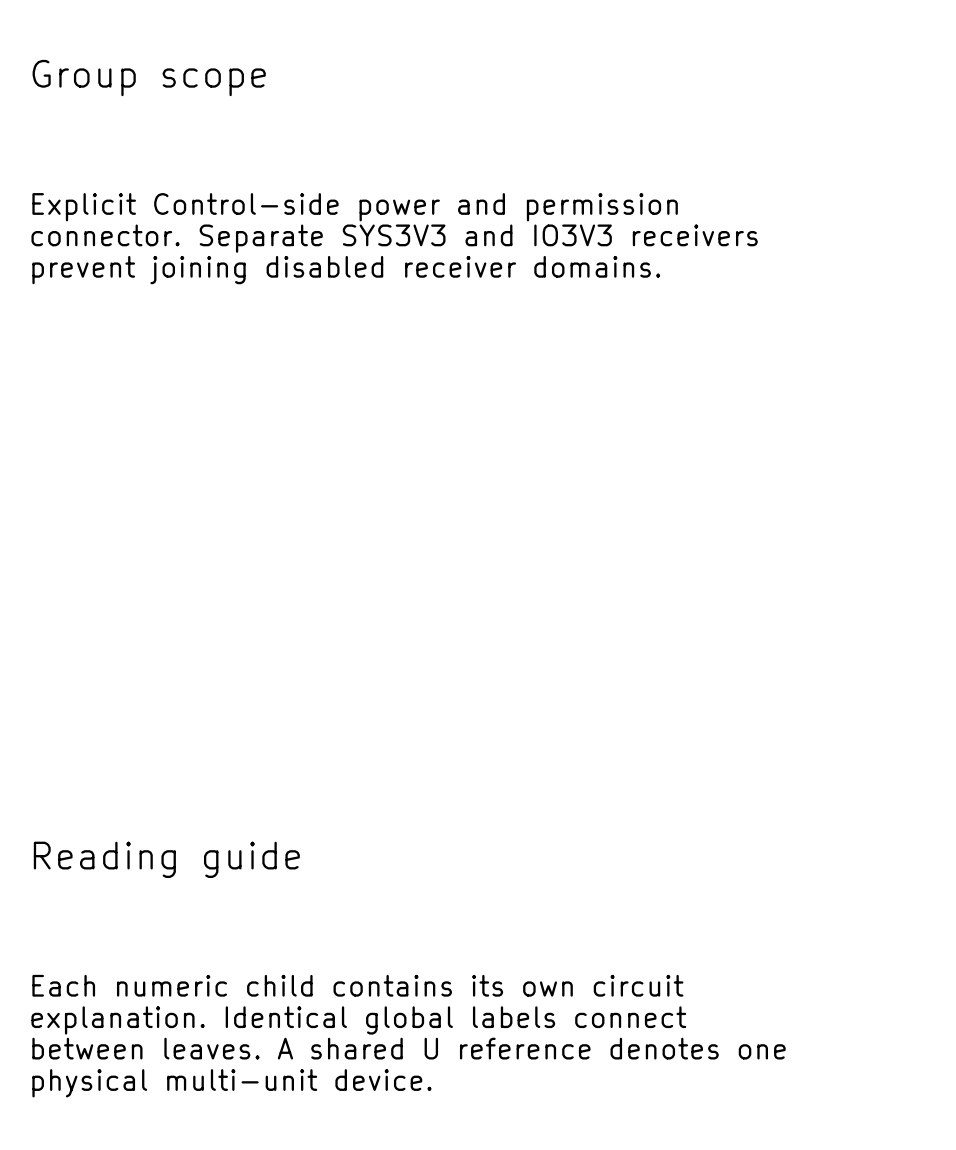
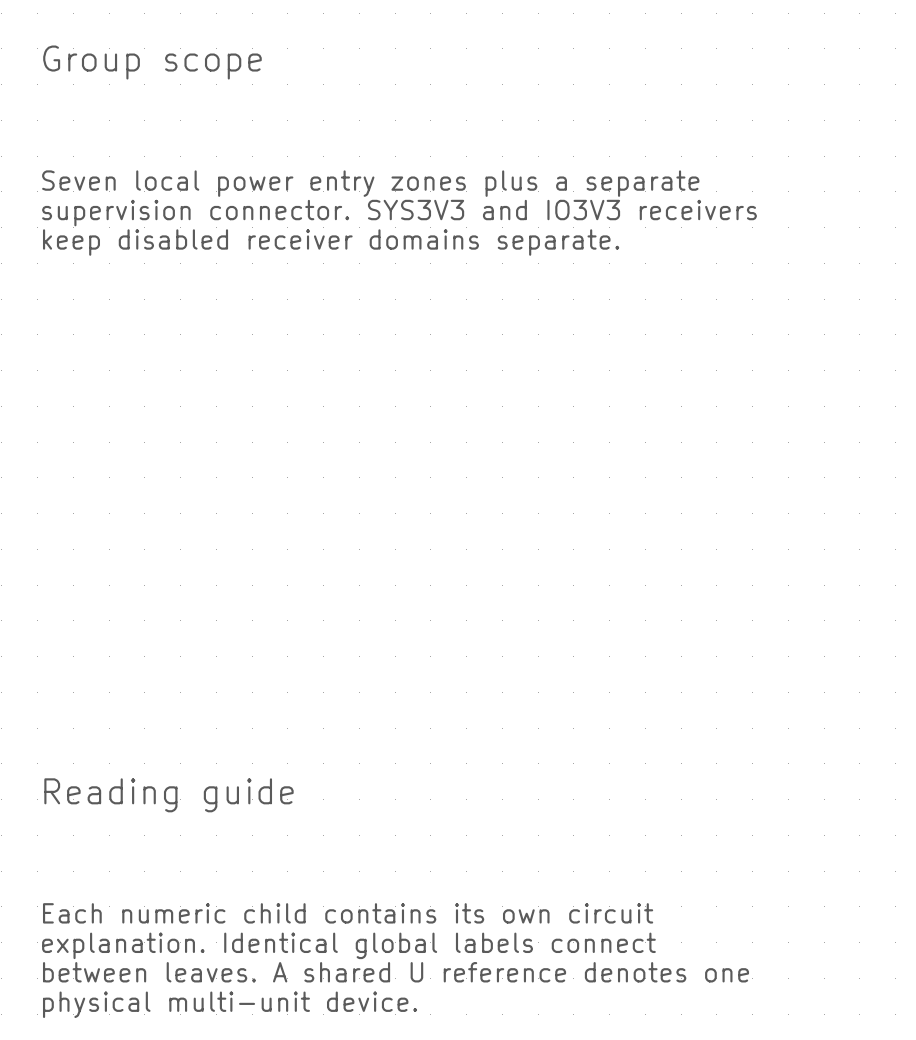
text: Explicit Control-side power and permission (355, 207) -> Seven local power entry zones plus a separate (370, 183)
text: connector. Separate SYS3V3 and IO3V3 receivers (394, 238) -> supervision connector. SYS3V3 and IO3V3 receivers (399, 213)
text: prevent joining disabled receiver domains. (346, 270) -> keep disabled receiver domains separate. (331, 242)

